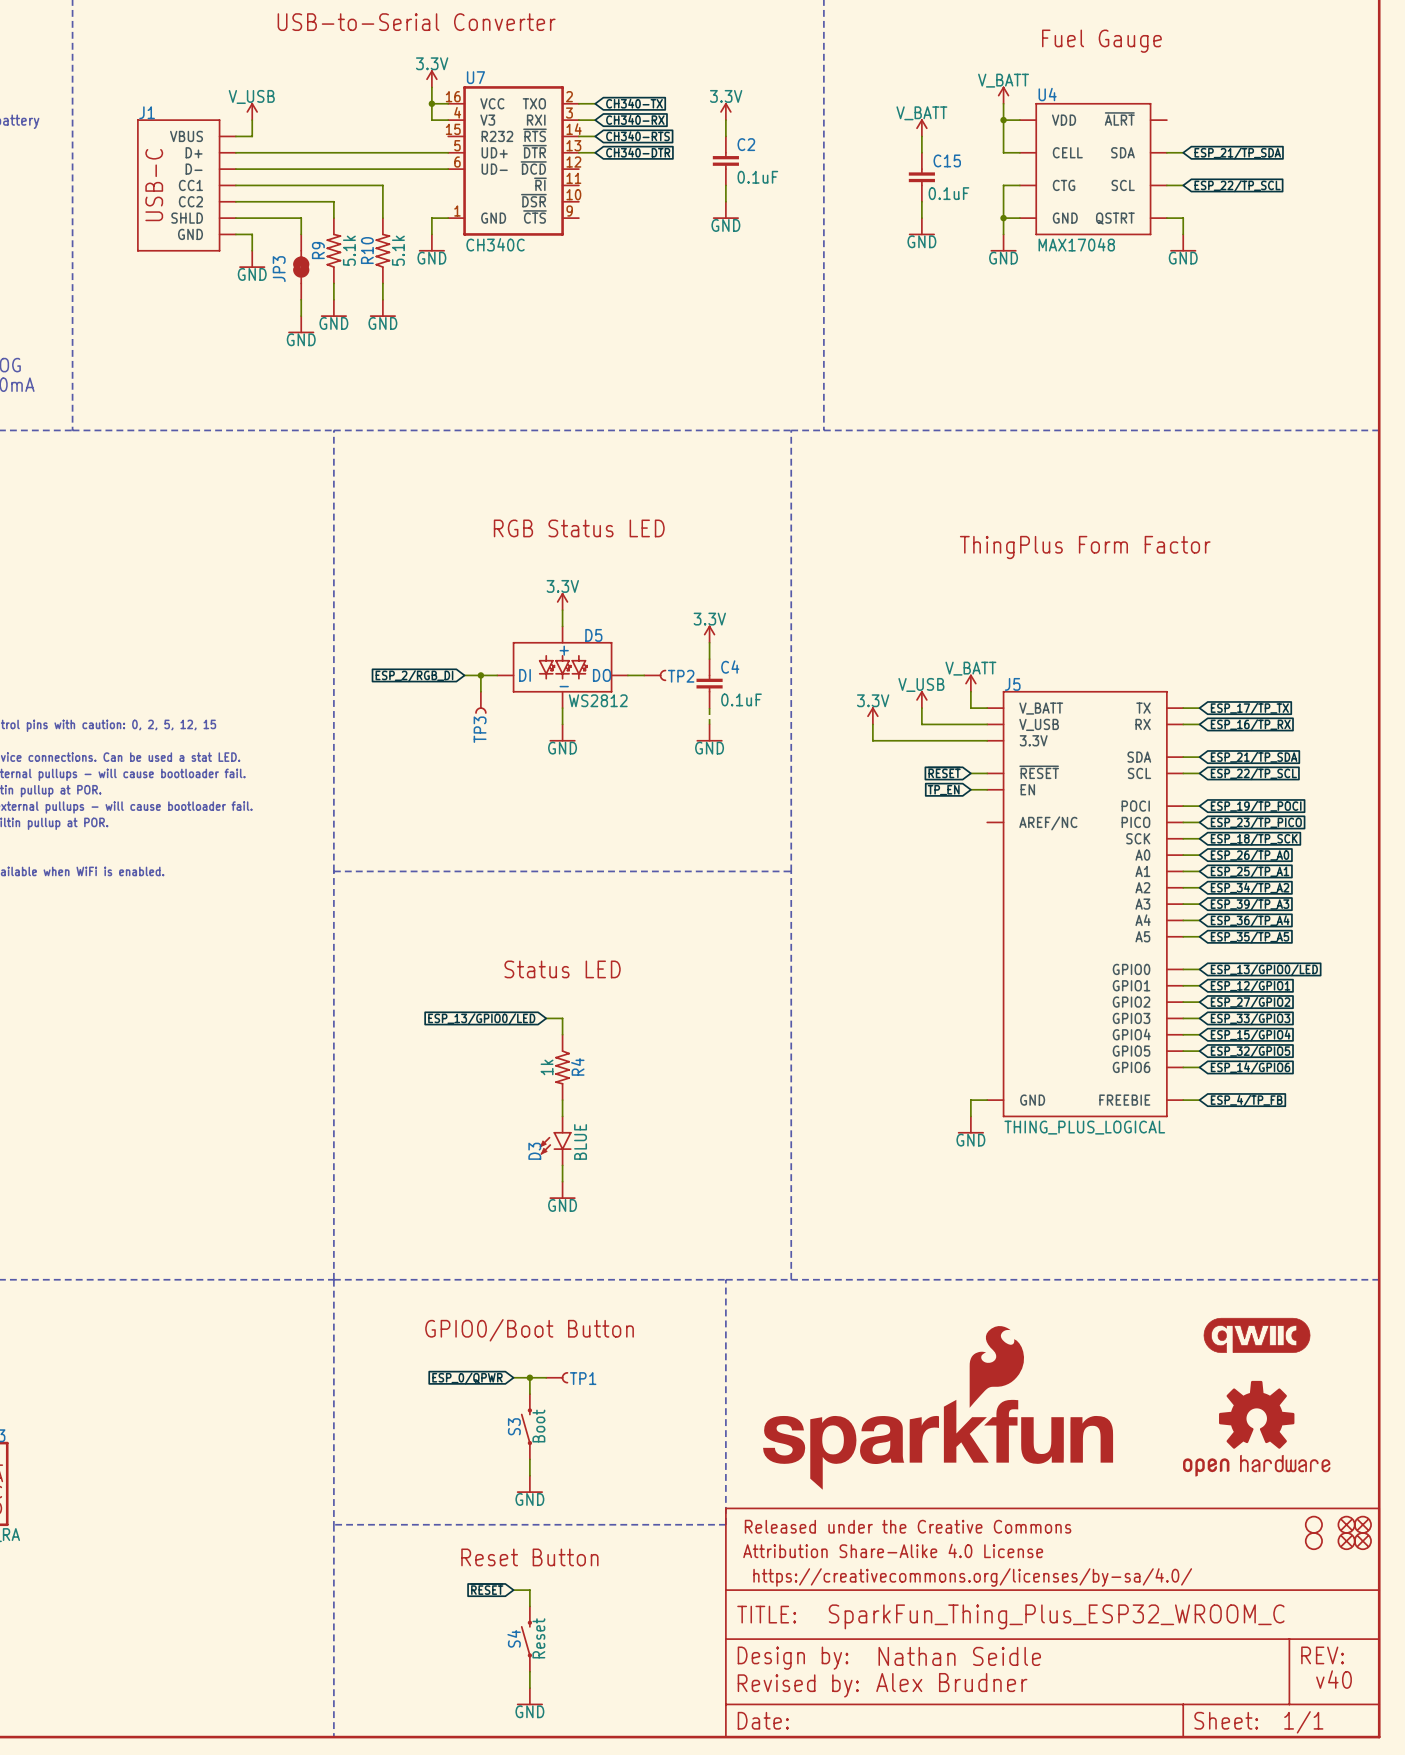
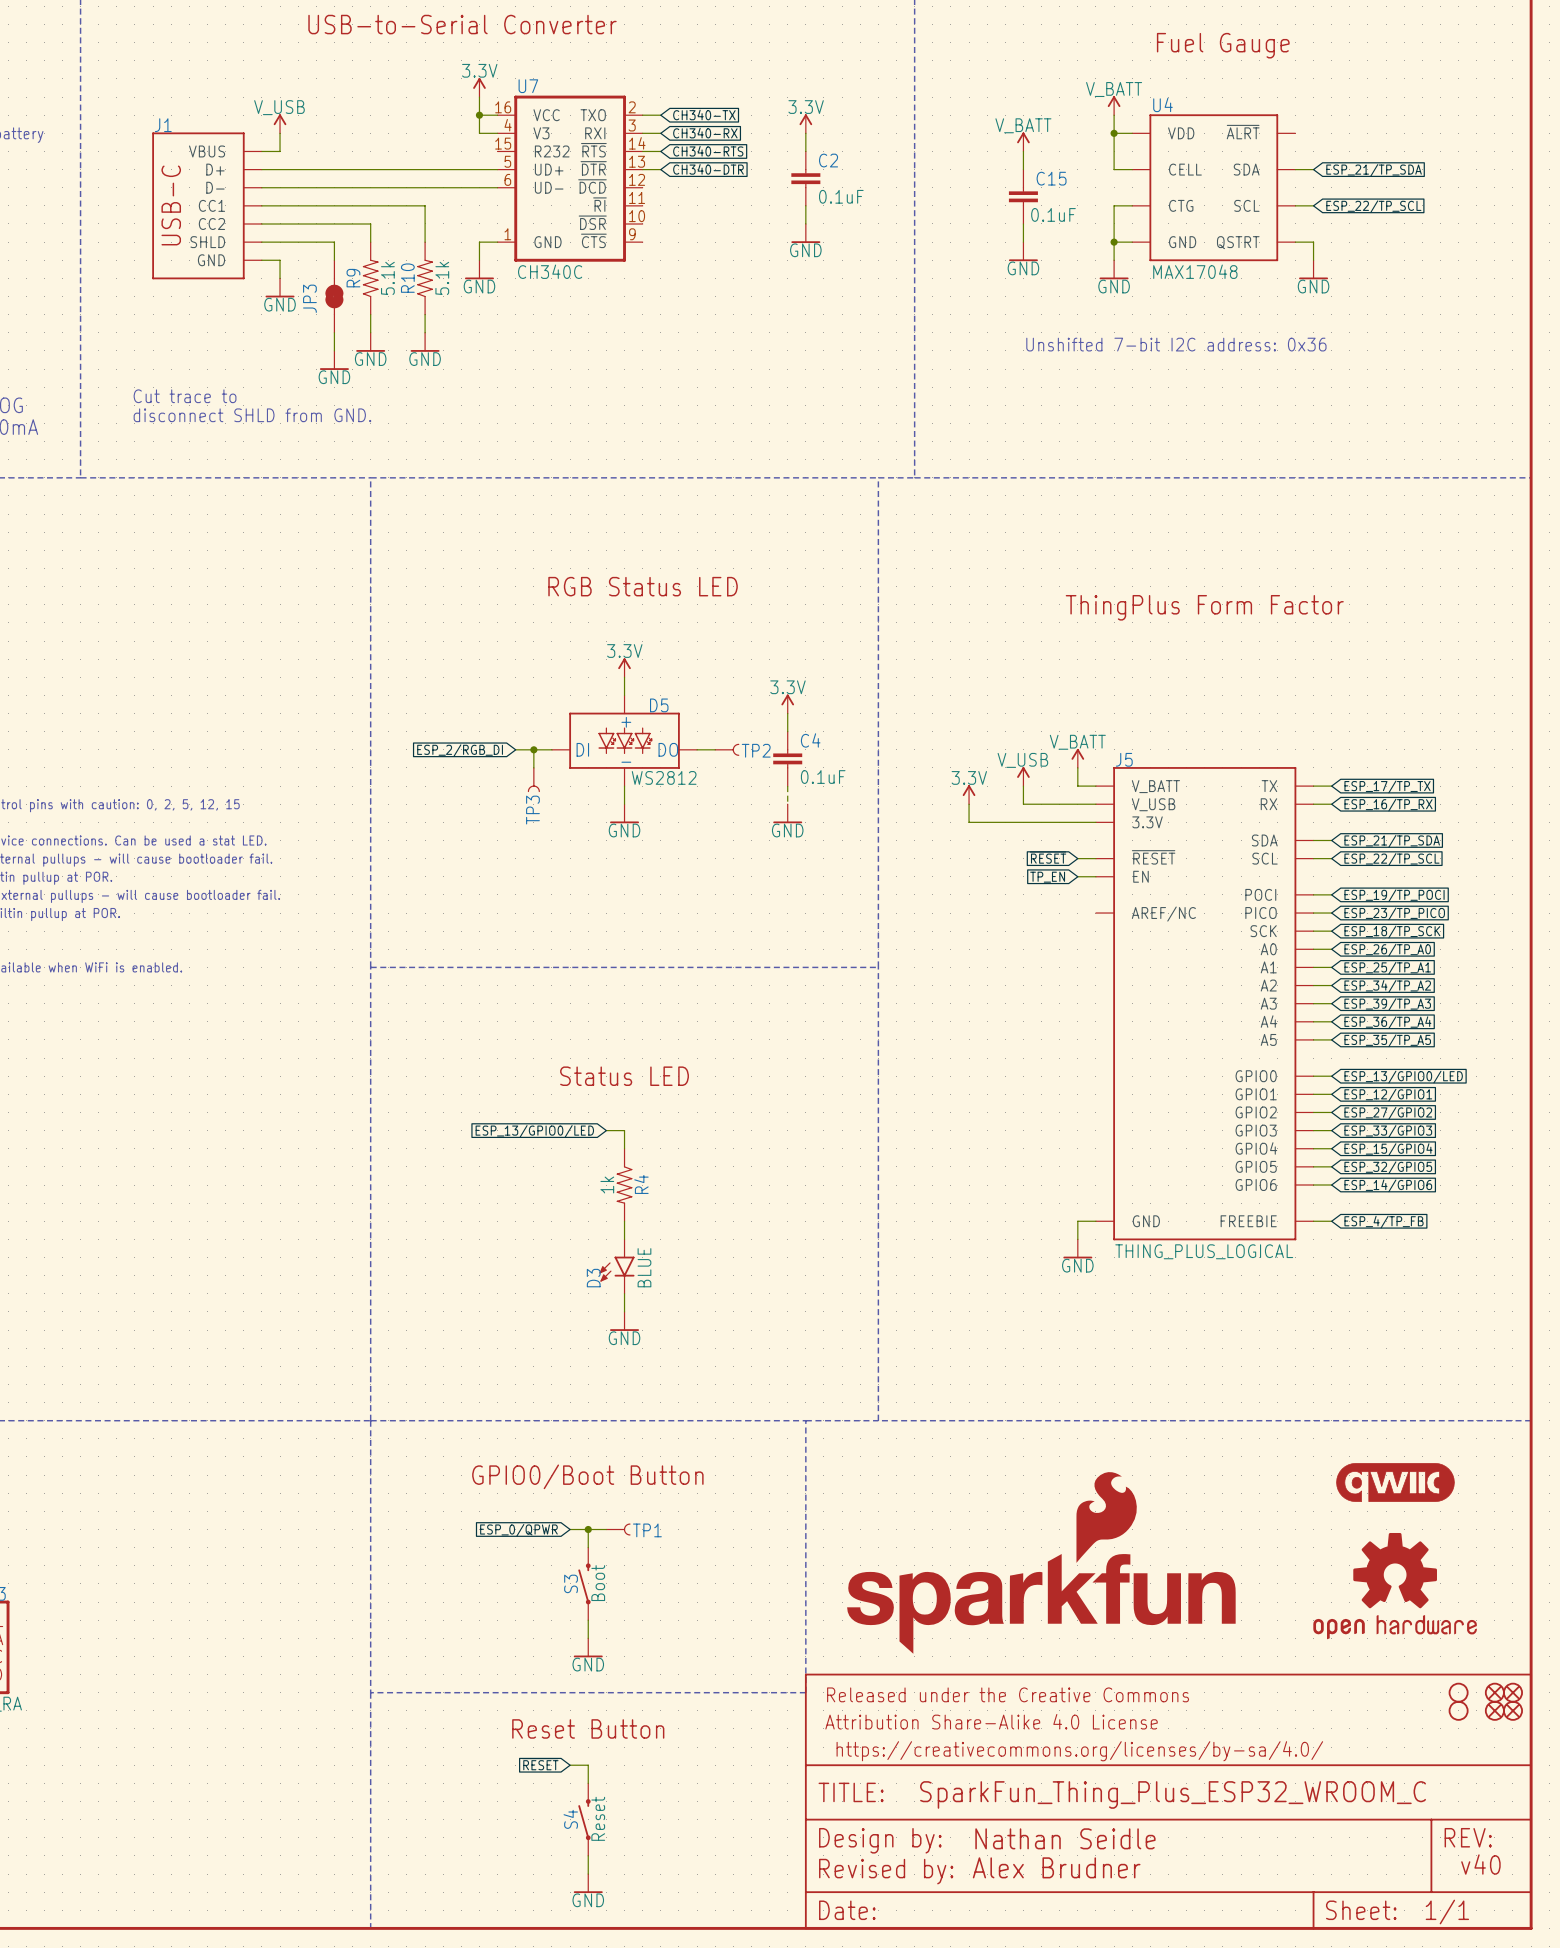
text: none -> Unshifted 7-bit I2C address: 0x36 (1176, 344)
text: none -> Cut trace to (185, 396)
text: none -> disconnect SHLD from GND. (252, 415)

